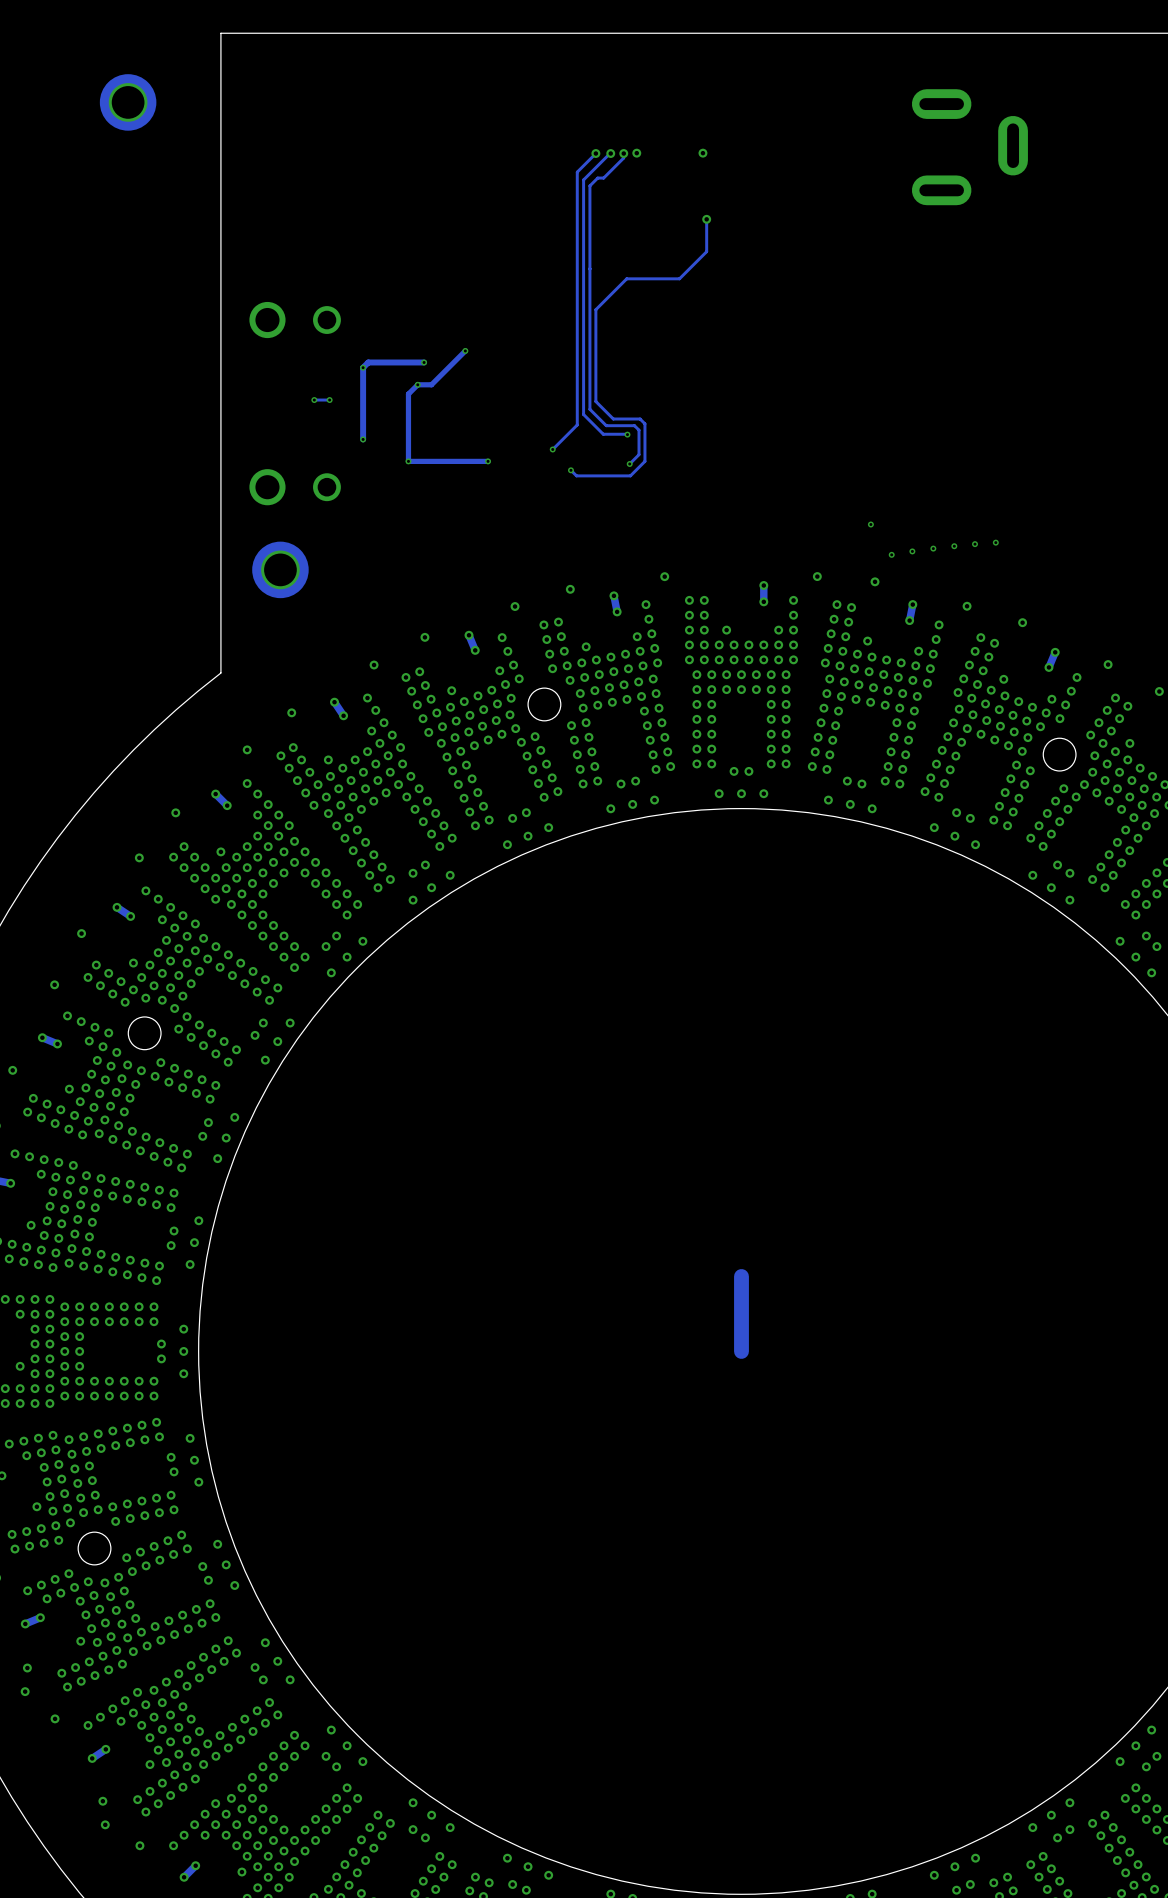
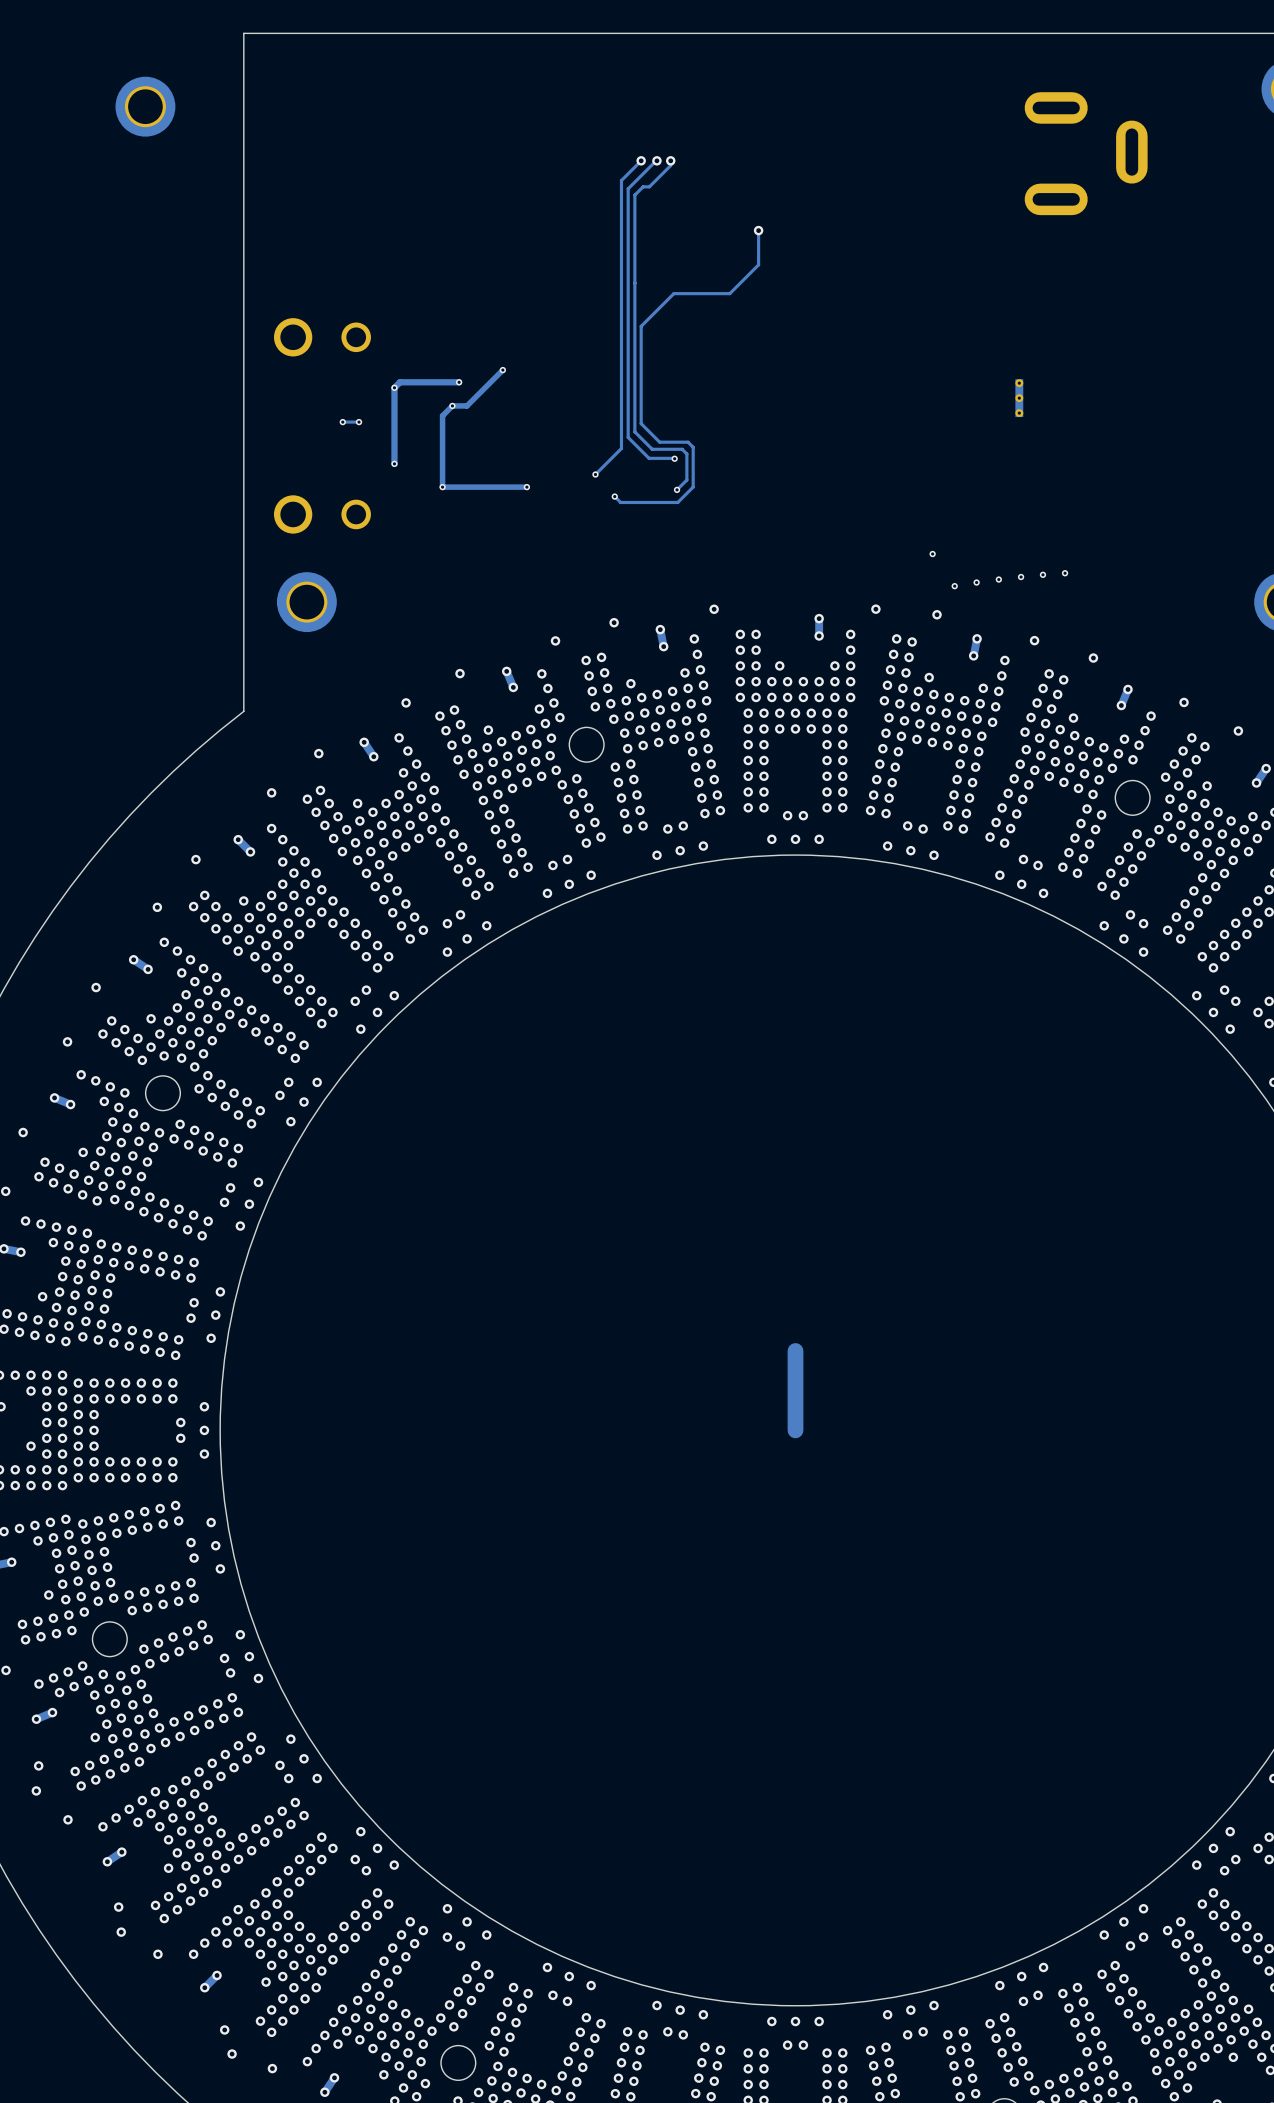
part position: (969, 147) -> (1086, 153)
via: (636, 153) -> none
via: (702, 153) -> none
part: none -> (1019, 398)

